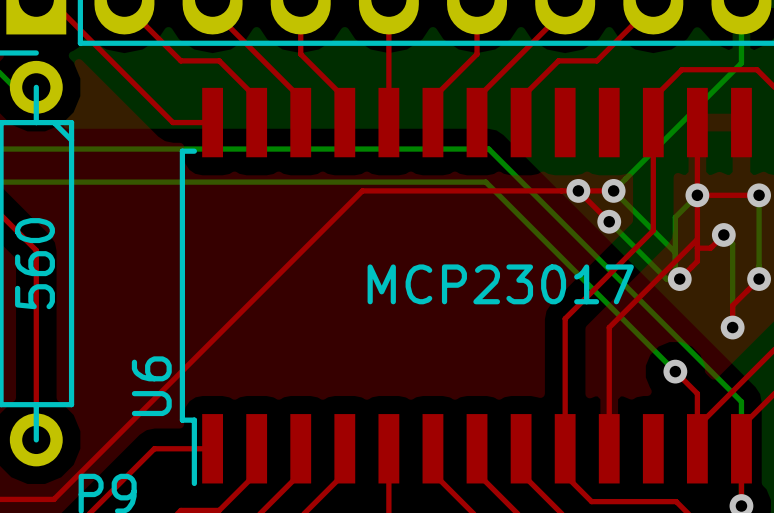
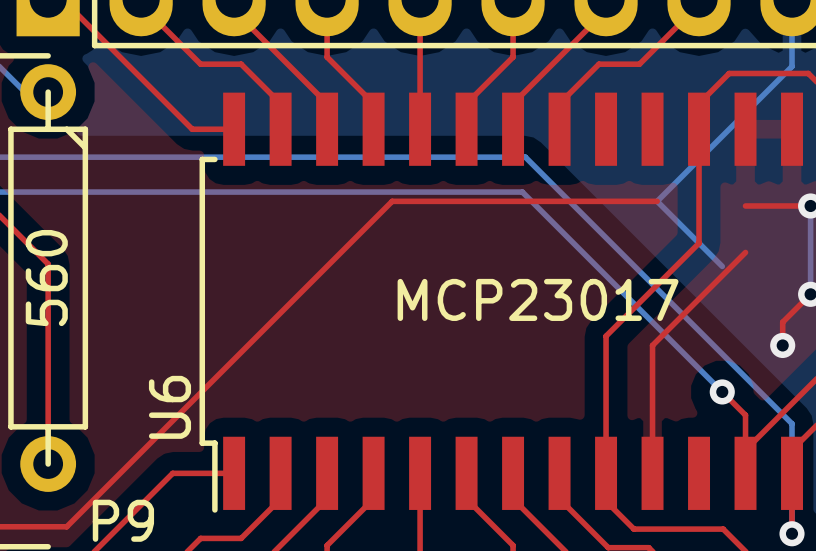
top track: (697, 122) (697, 261) (679, 279) -> none
top track: (578, 190) (609, 221) -> none
via: (578, 190) -> none
via: (613, 190) -> none
bottom track: (697, 195) (675, 217) (675, 274) (679, 279) (666, 279) (609, 221) -> none
via: (697, 195) -> none
via: (609, 221) -> none
top track: (723, 234) (710, 248) (697, 248) -> none
bottom track: (723, 234) (732, 243) (732, 327) -> none
via: (723, 234) -> none
via: (679, 279) -> none

